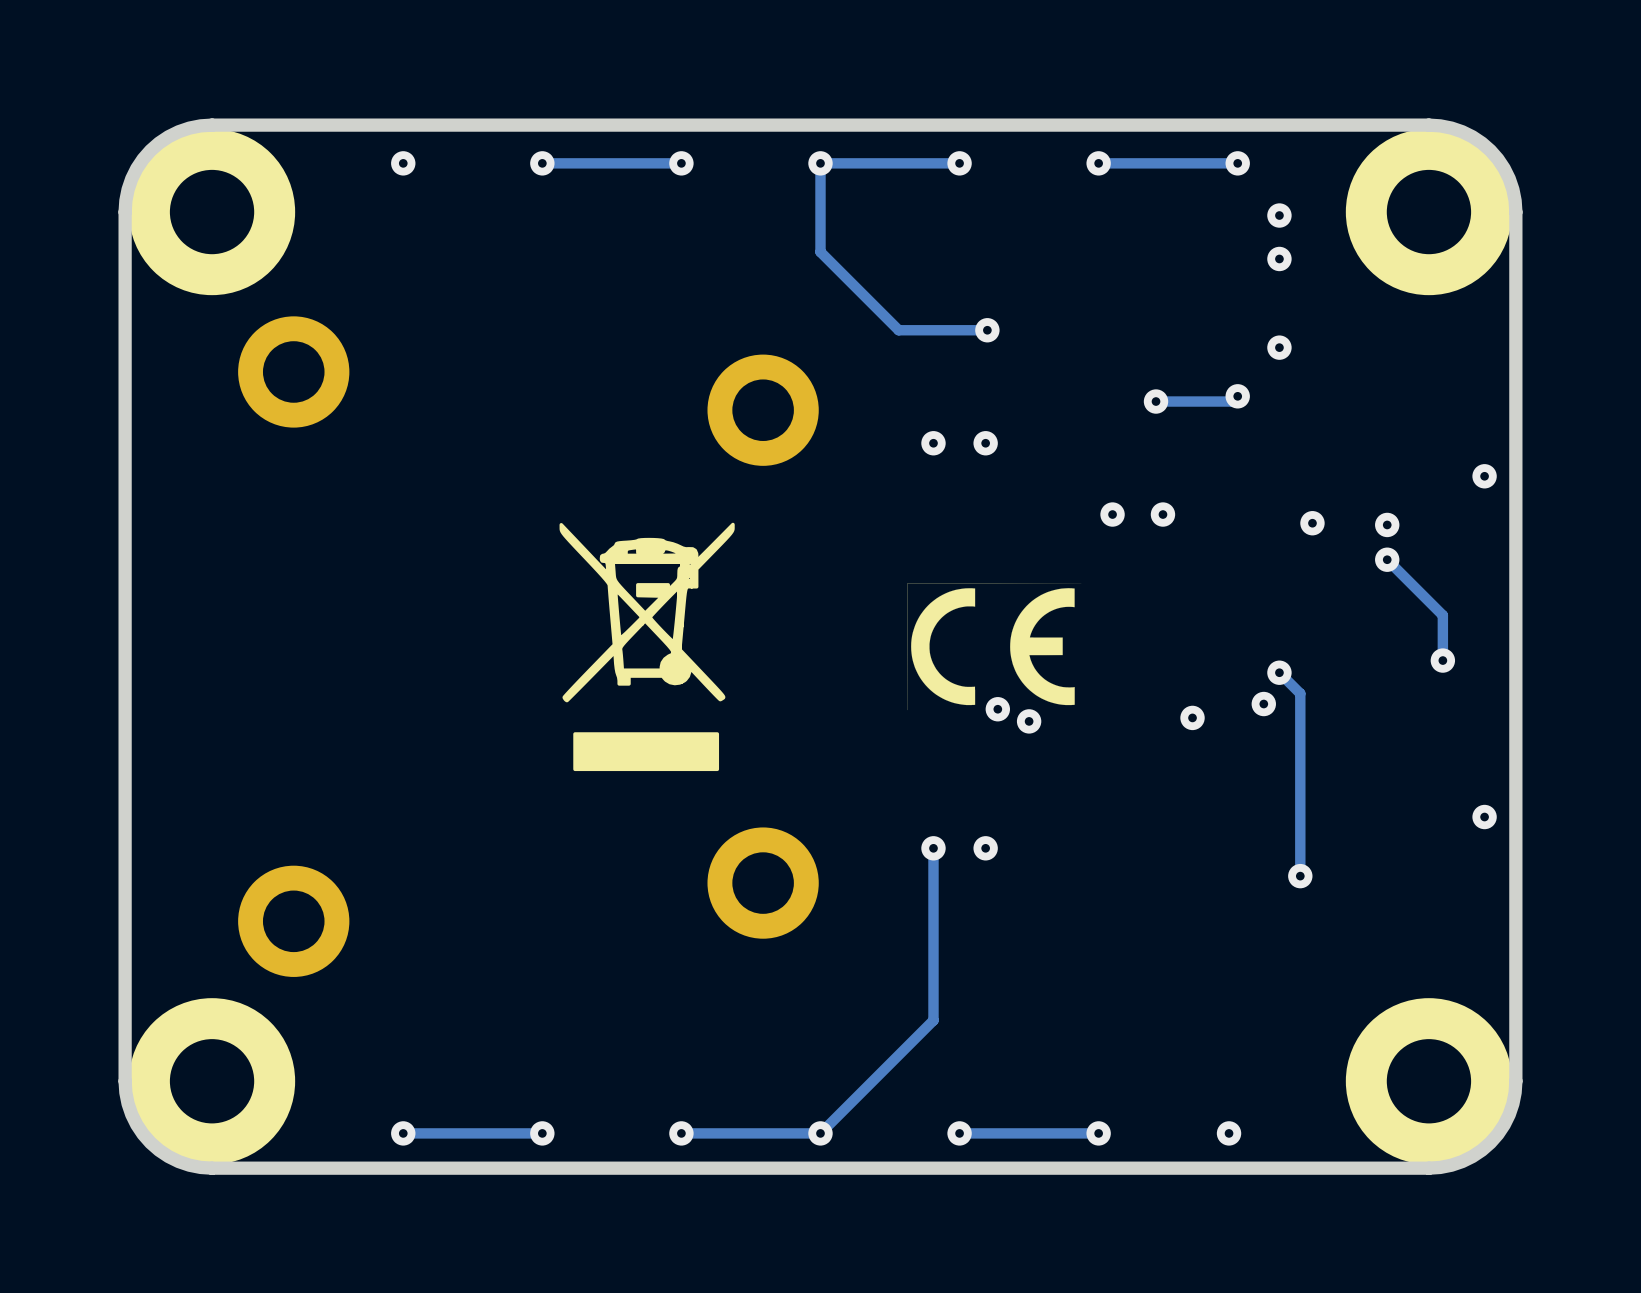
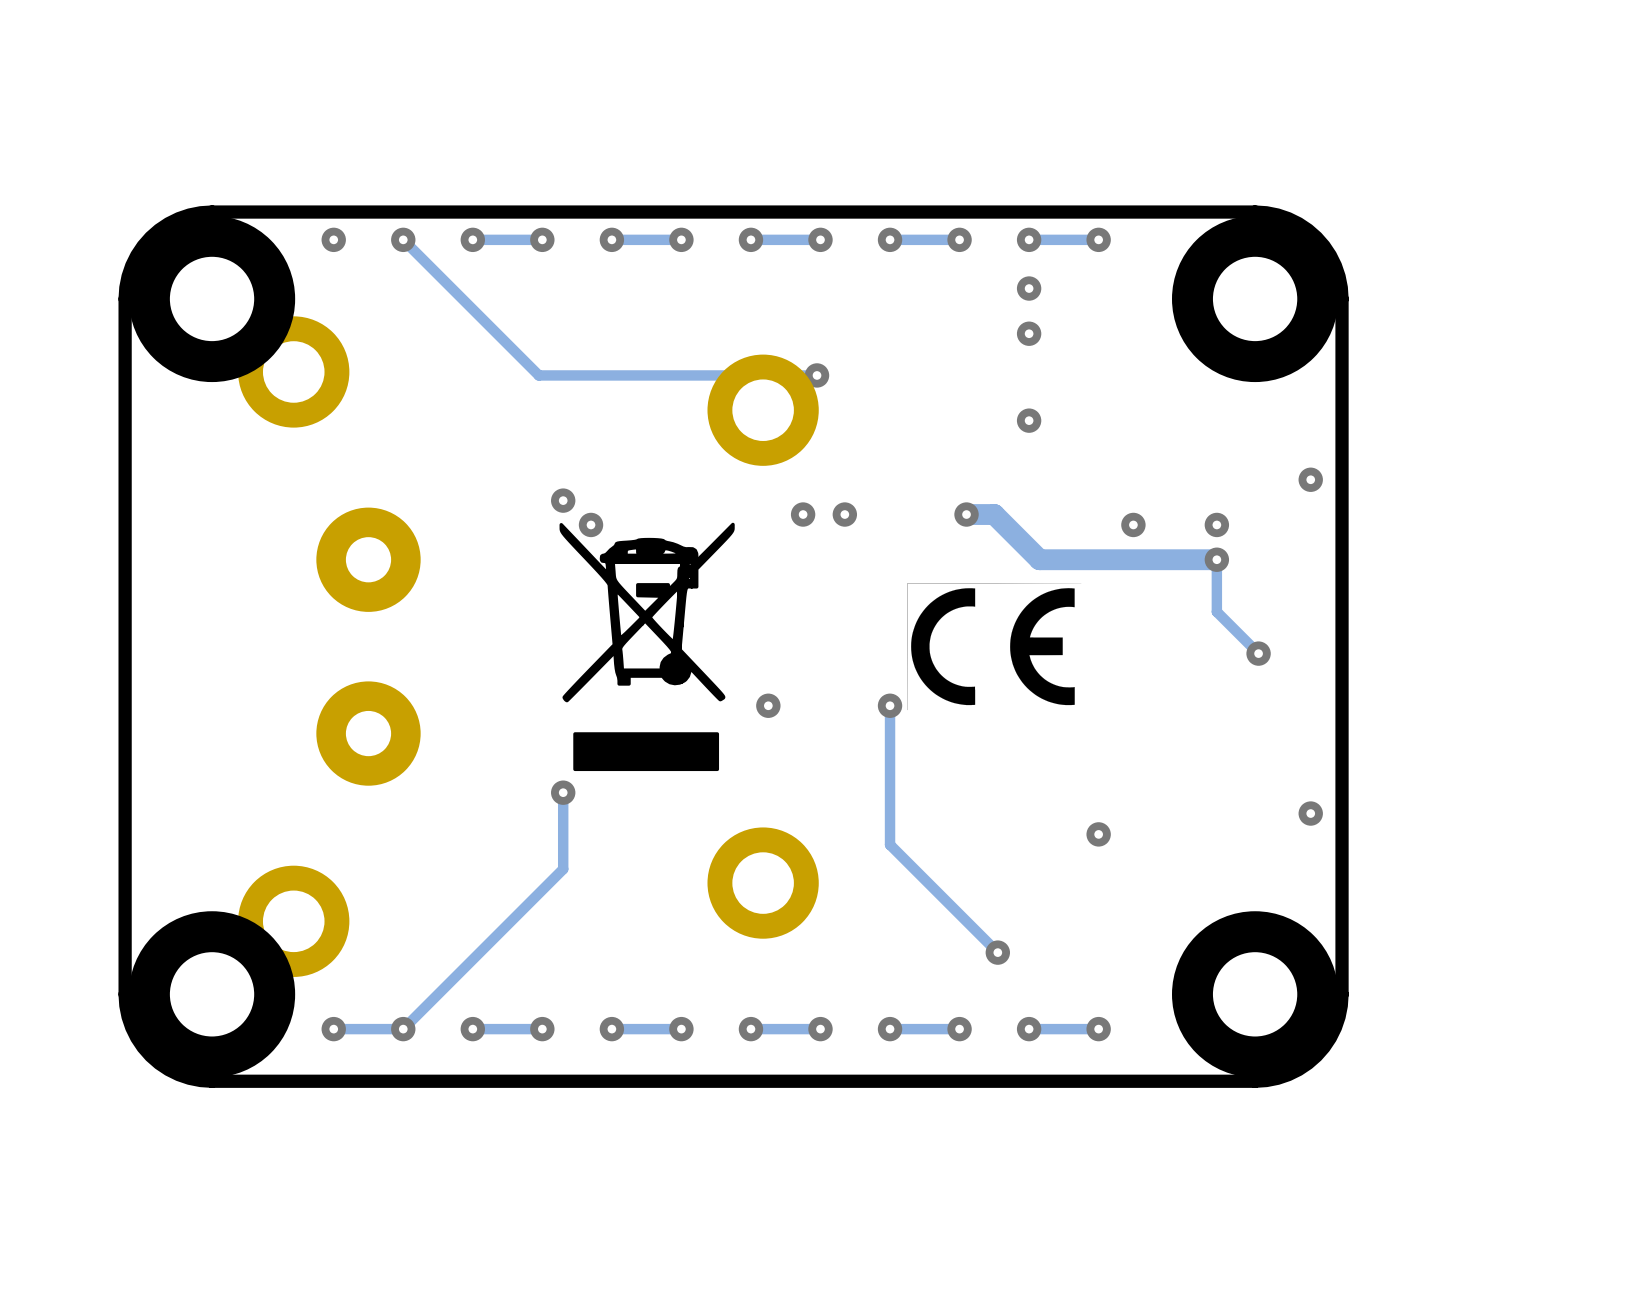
via: (403, 163) -> none
via: (542, 163) -> none
track: (681, 163) (542, 163) -> none
via: (681, 163) -> none
via: (820, 163) -> none
track: (959, 163) (820, 163) (820, 252) (898, 330) (987, 330) -> none
via: (959, 163) -> none
via: (1098, 163) -> none
track: (1237, 163) (1098, 163) -> none
via: (1237, 163) -> none
part position: (212, 212) -> (212, 298)
board edge: none -> (1255, 212) (200, 212) (178, 218) (150, 237) (131, 265) (125, 298)
part position: (1428, 212) -> (1255, 298)
via: (1279, 215) -> none
via: none -> (333, 239)
track: none -> (403, 239) (538, 375) (817, 375)
via: none -> (403, 239)
via: none -> (472, 239)
track: none -> (542, 239) (472, 239)
via: none -> (542, 239)
via: none -> (611, 239)
track: none -> (681, 239) (611, 239)
via: none -> (681, 239)
via: none -> (750, 239)
track: none -> (820, 239) (750, 239)
via: none -> (820, 239)
via: none -> (890, 239)
track: none -> (959, 239) (890, 239)
via: none -> (959, 239)
via: none -> (1029, 239)
track: none -> (1098, 239) (1029, 239)
via: none -> (1098, 239)
via: (1279, 258) -> none
via: none -> (1029, 288)
board edge: (125, 298) (125, 212) (131, 178) (143, 159) (159, 143) (178, 131) (200, 125) (1428, 125) (1462, 131) (1490, 150) (1504, 168) (1515, 200) (1515, 1081) (1512, 1103) (1504, 1124) (1490, 1142) (1472, 1156) (1451, 1165) (1428, 1168) (200, 1167) (178, 1161) (159, 1150) (143, 1134) (131, 1114) (125, 1081) (125, 994) -> (1255, 212) (1288, 218) (1316, 237) (1335, 265) (1342, 298) (1342, 994) (1339, 1016) (1330, 1037) (1308, 1063) (1277, 1078) (1255, 1081) (212, 1081) (178, 1074) (150, 1055) (131, 1027) (125, 994)
via: (987, 330) -> none
via: none -> (1029, 333)
via: (1279, 347) -> none
via: none -> (817, 375)
track: (1237, 396) (1232, 401) (1156, 401) -> none
via: (1237, 396) -> none
via: (1156, 401) -> none
via: none -> (1029, 420)
via: (933, 443) -> none
via: (985, 443) -> none
via: (1484, 476) -> none
via: none -> (563, 500)
via: none -> (803, 514)
via: none -> (844, 514)
track: none -> (966, 514) (994, 514) (1039, 559) (1216, 559) (1216, 611) (1258, 653)
via: none -> (966, 514)
via position: (1112, 514) -> (1133, 524)
via: (1162, 514) -> none
via position: (1312, 523) -> (1310, 479)
via: none -> (591, 524)
via: none -> (1216, 524)
via: (1387, 524) -> none
via: none -> (1216, 559)
track: (1387, 559) (1442, 615) (1442, 660) -> none
via: (1387, 559) -> none
part: none -> (368, 646)
via: (1442, 660) -> none
track: (1279, 672) (1300, 693) (1300, 876) -> none
via position: (1279, 672) -> (1258, 653)
via: (1263, 704) -> none
via: none -> (768, 705)
track: none -> (890, 705) (890, 844) (997, 952)
via: none -> (890, 705)
via: (997, 709) -> none
via: (1192, 717) -> none
via: (1029, 721) -> none
track: none -> (563, 792) (563, 869) (403, 1029) (333, 1029)
via: none -> (563, 792)
via: none -> (1310, 813)
via: (1484, 817) -> none
via: none -> (1098, 834)
track: (933, 848) (933, 1020) (820, 1133) (681, 1133) -> none
via: (933, 848) -> none
via: (985, 848) -> none
via: (1300, 876) -> none
via: none -> (997, 952)
via: none -> (333, 1029)
via: none -> (403, 1029)
via: none -> (472, 1029)
track: none -> (542, 1029) (472, 1029)
via: none -> (542, 1029)
via: none -> (611, 1029)
track: none -> (681, 1029) (611, 1029)
via: none -> (681, 1029)
via: none -> (750, 1029)
track: none -> (820, 1029) (750, 1029)
via: none -> (820, 1029)
via: none -> (890, 1029)
track: none -> (959, 1029) (890, 1029)
via: none -> (959, 1029)
via: none -> (1029, 1029)
track: none -> (1098, 1029) (1029, 1029)
via: none -> (1098, 1029)
part position: (212, 1081) -> (212, 994)
part position: (1428, 1081) -> (1255, 994)
via: (403, 1133) -> none
track: (542, 1133) (403, 1133) -> none
via: (542, 1133) -> none
via: (681, 1133) -> none
via: (820, 1133) -> none
via: (959, 1133) -> none
track: (1098, 1133) (959, 1133) -> none
via: (1098, 1133) -> none
via: (1229, 1133) -> none

